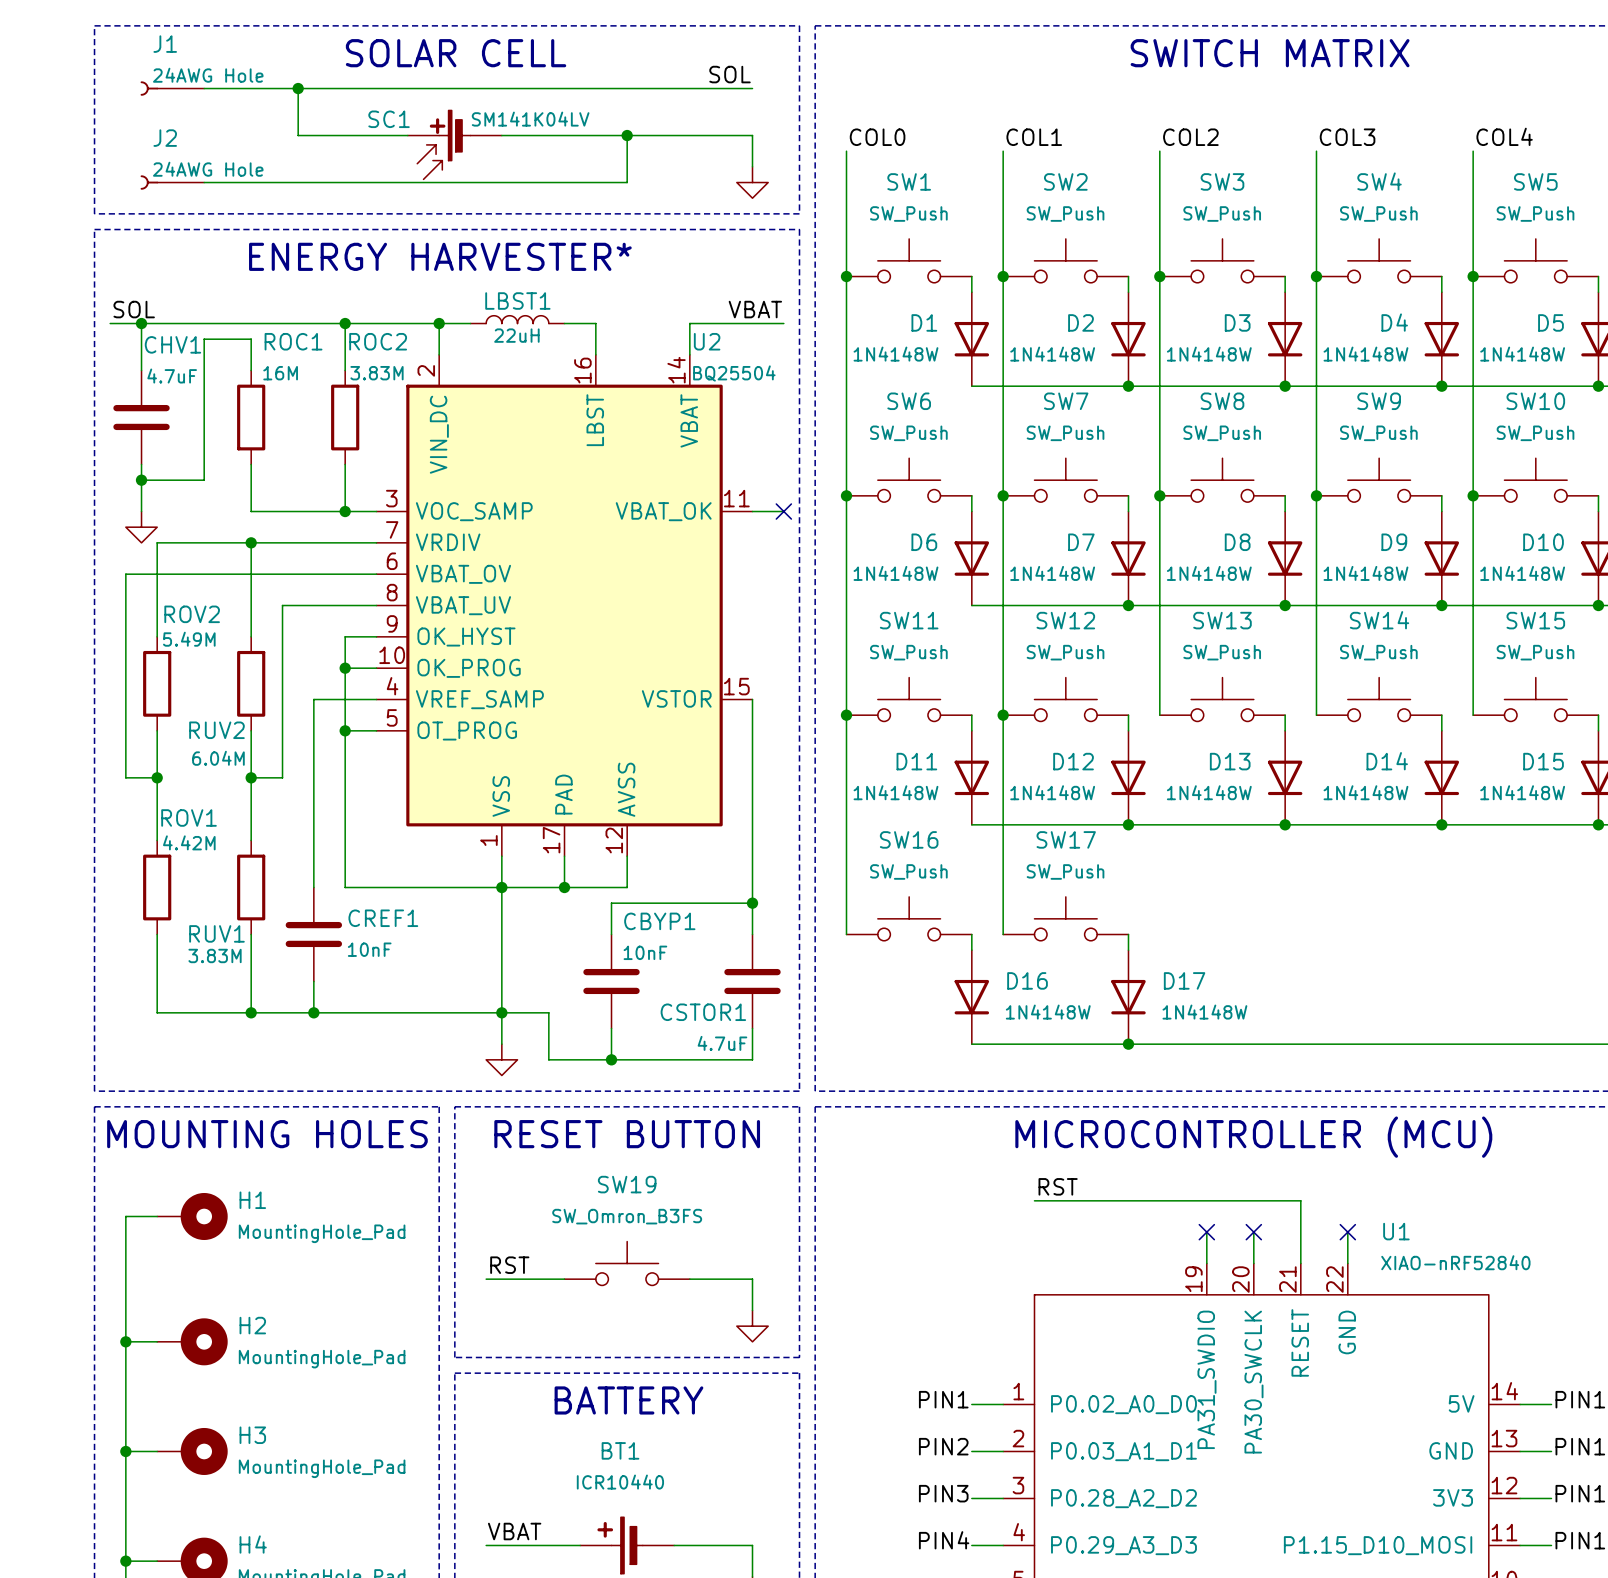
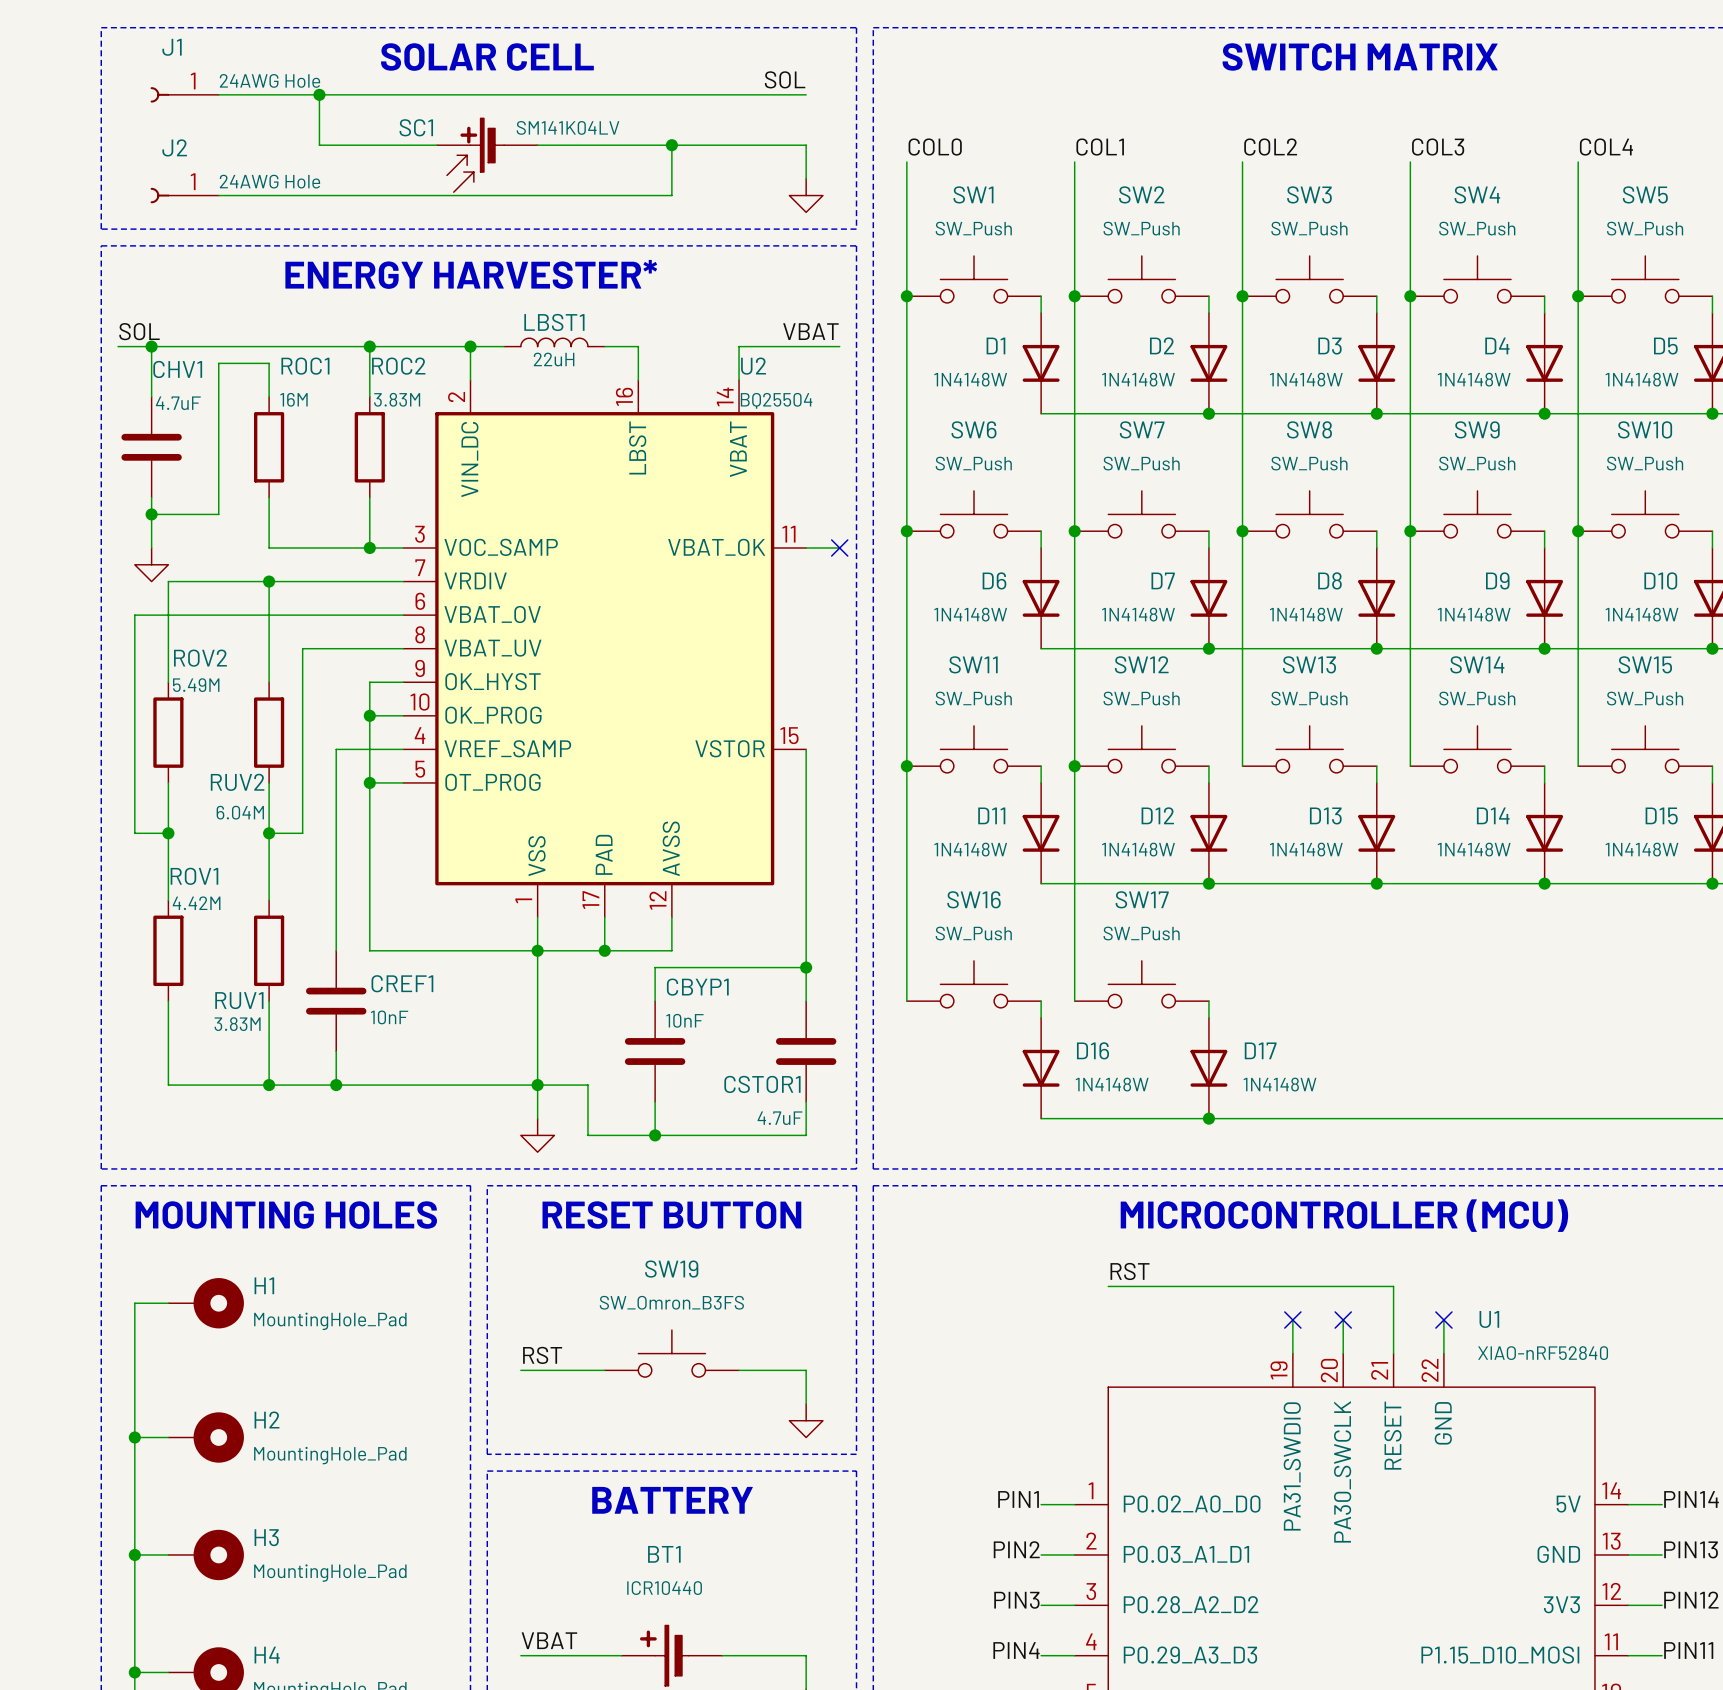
J1 pin number: none -> 1 (193, 81)
J1 value position: 24AWG Hole (208, 75) -> 24AWG Hole (269, 80)
J2 pin number: none -> 1 (193, 181)
J2 value position: 24AWG Hole (208, 169) -> 24AWG Hole (269, 181)

